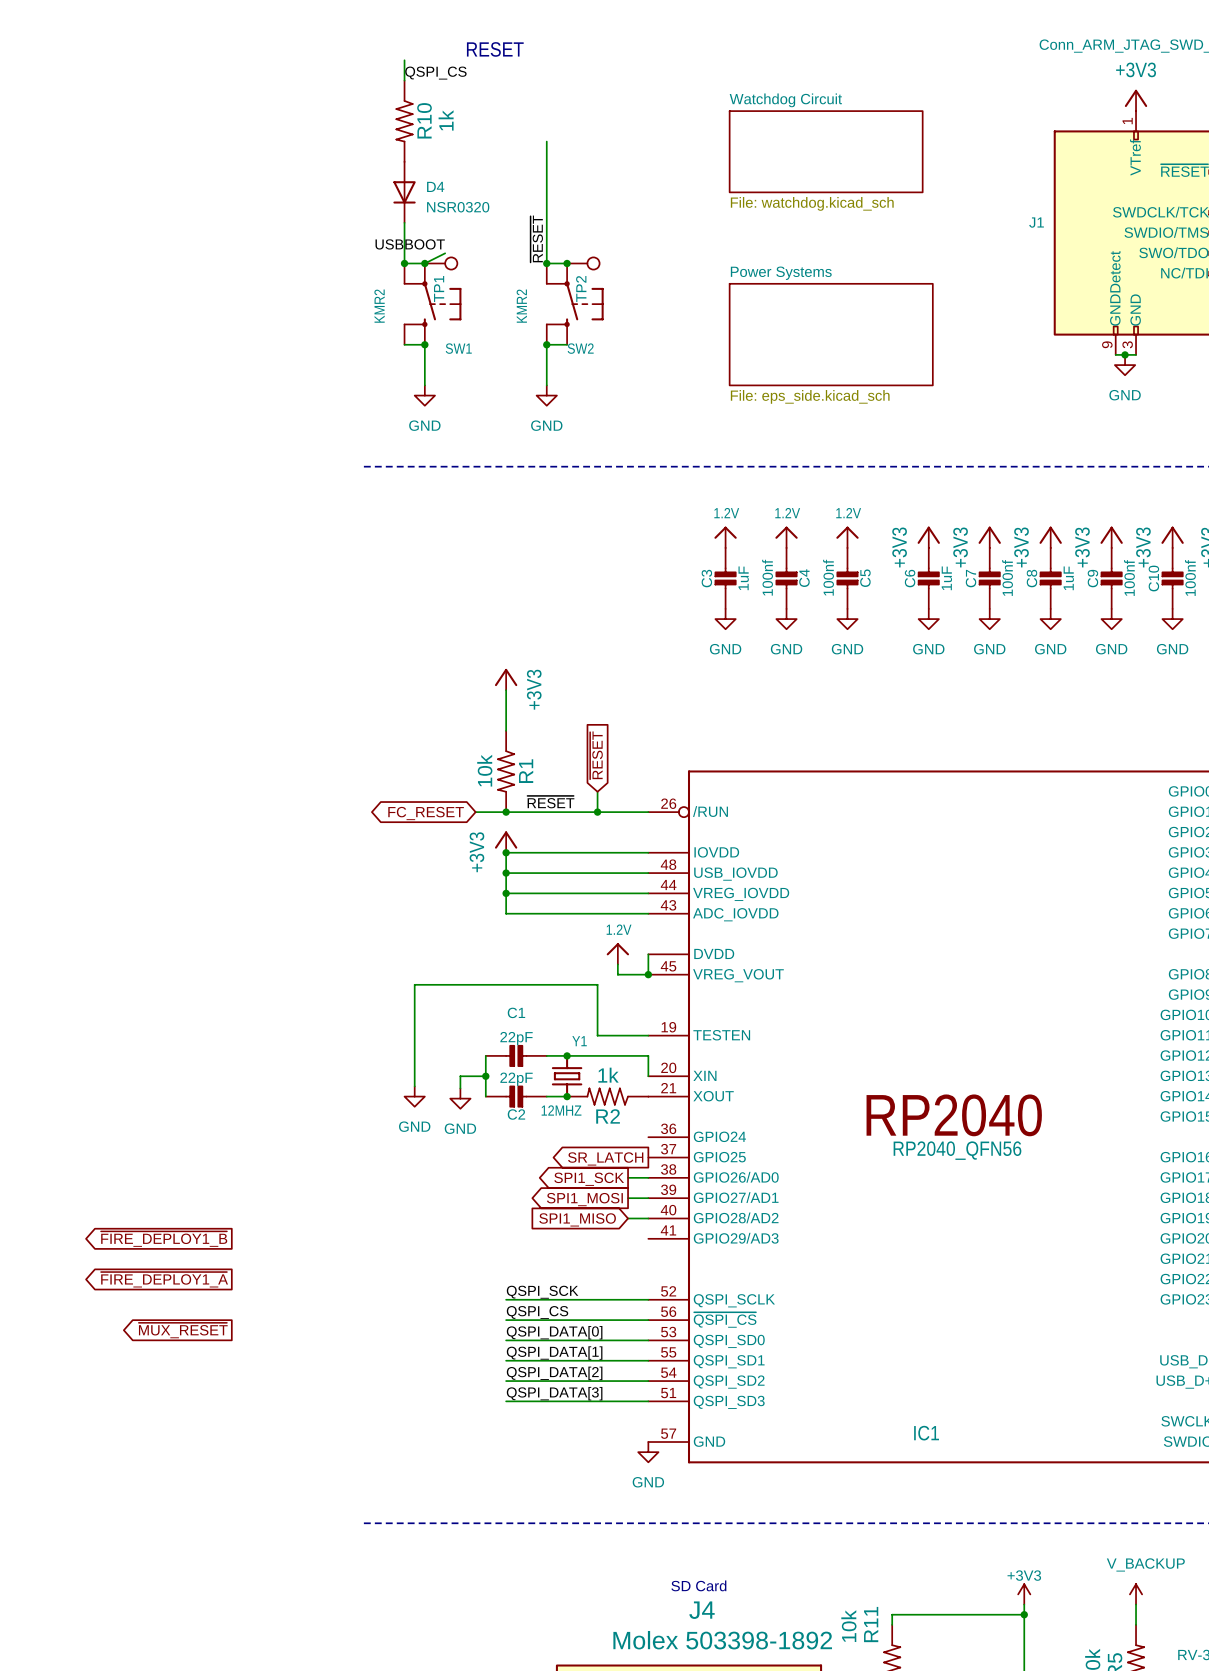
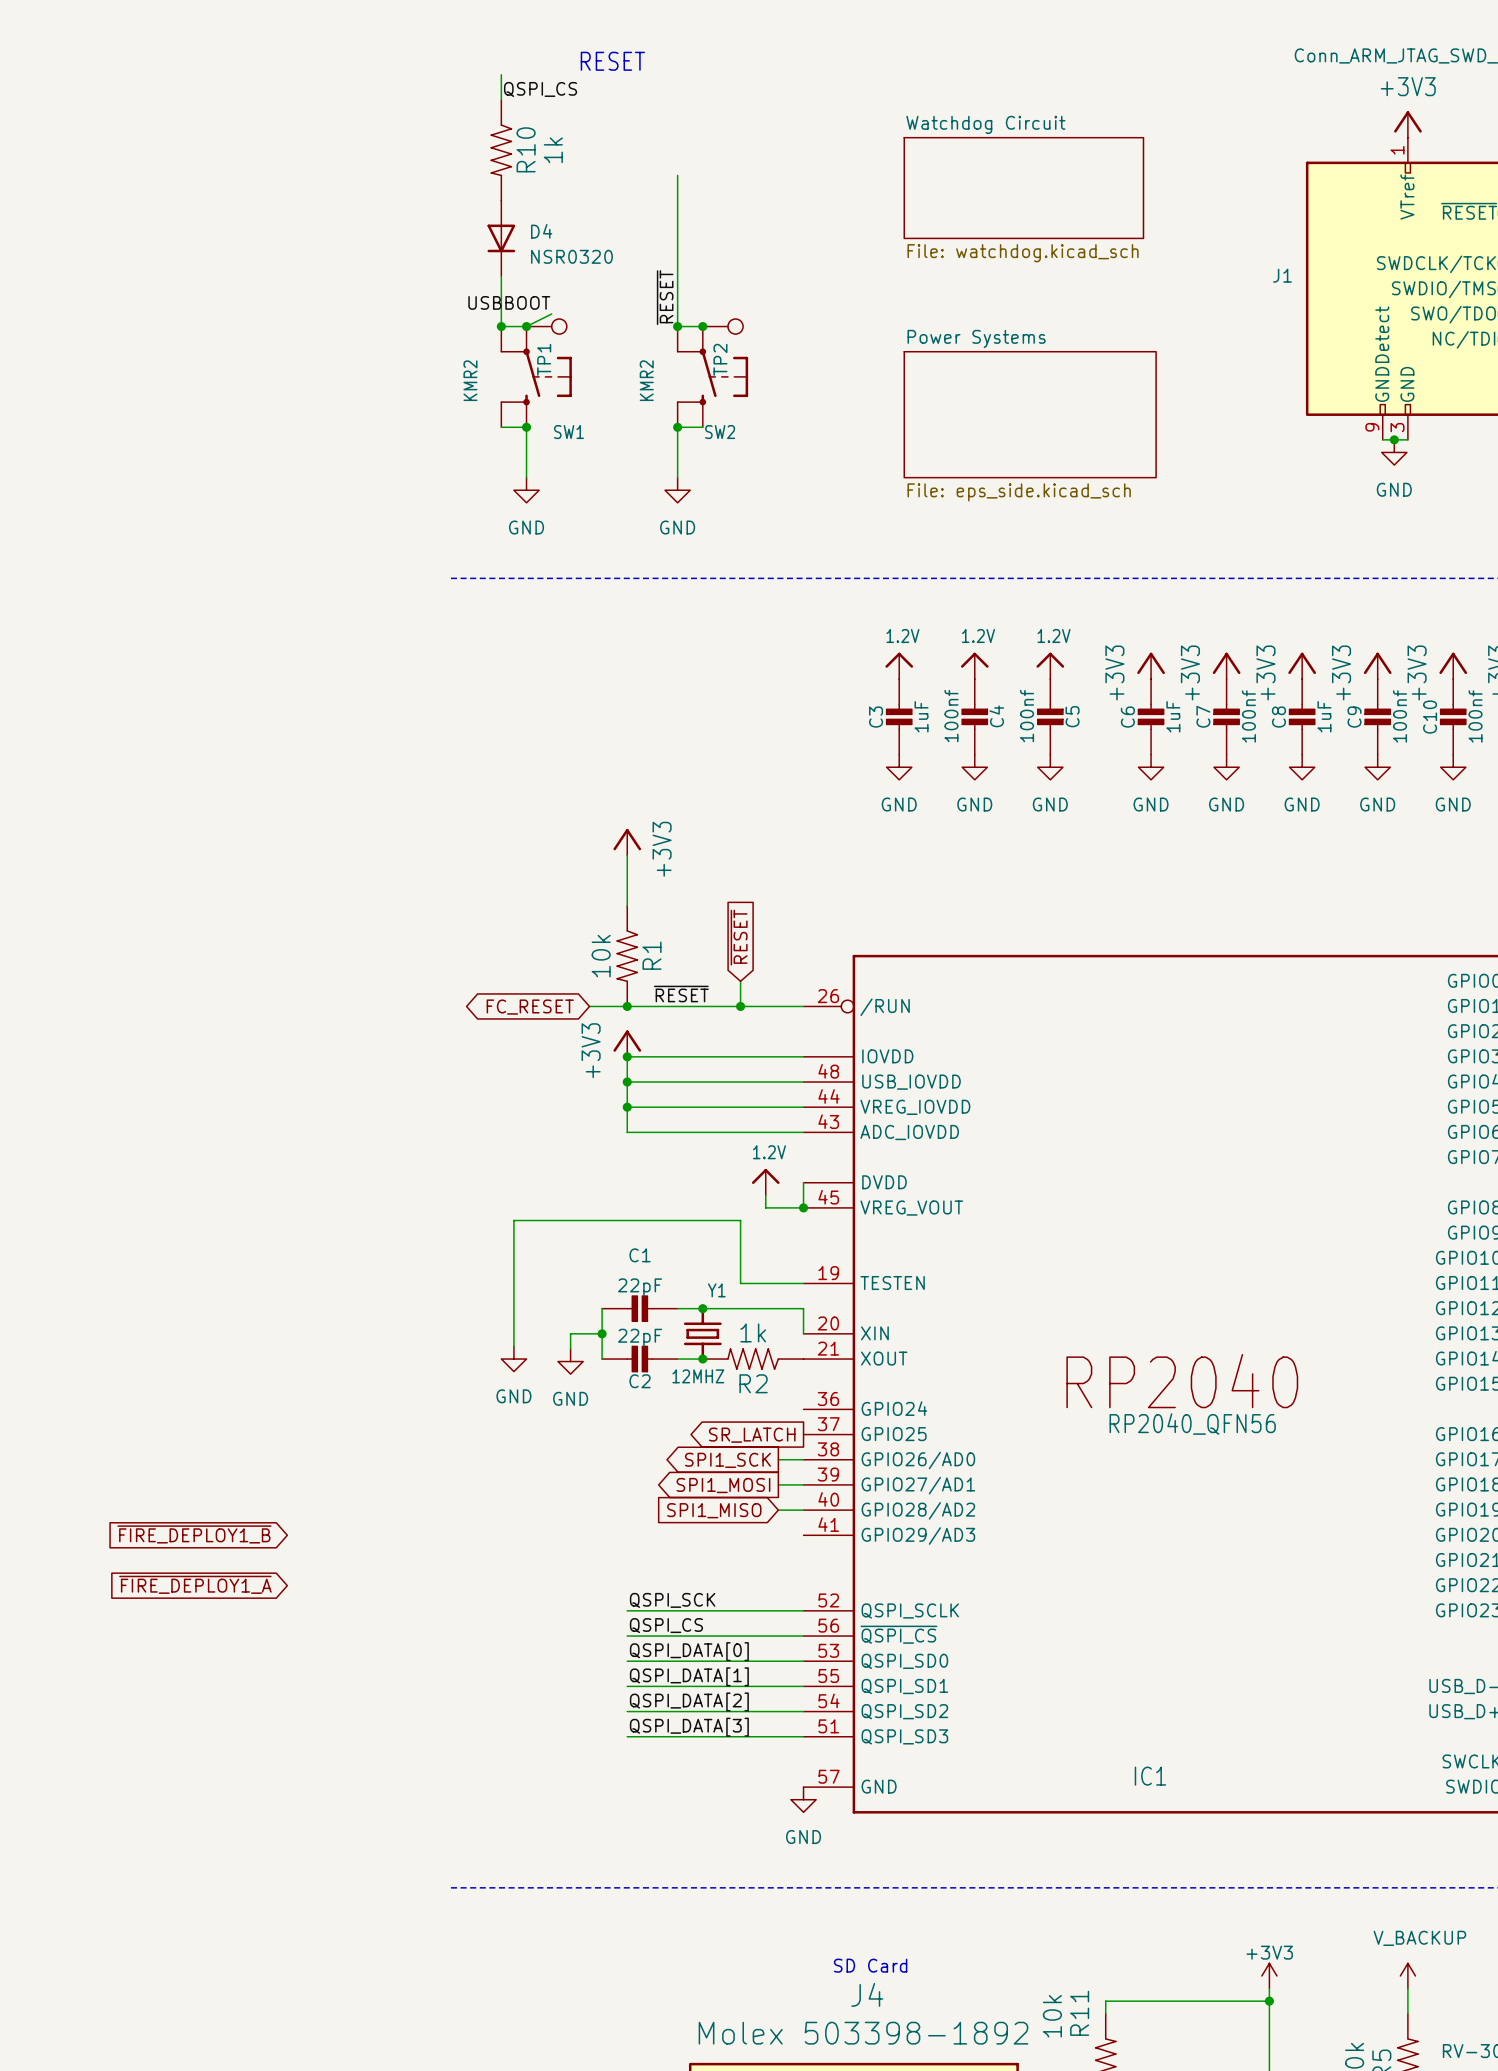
global label shape: output (164, 1239) -> input (194, 1534)
global label shape: output (164, 1279) -> input (195, 1584)
global label: ~{MUX_RESET} (183, 1330) -> none

